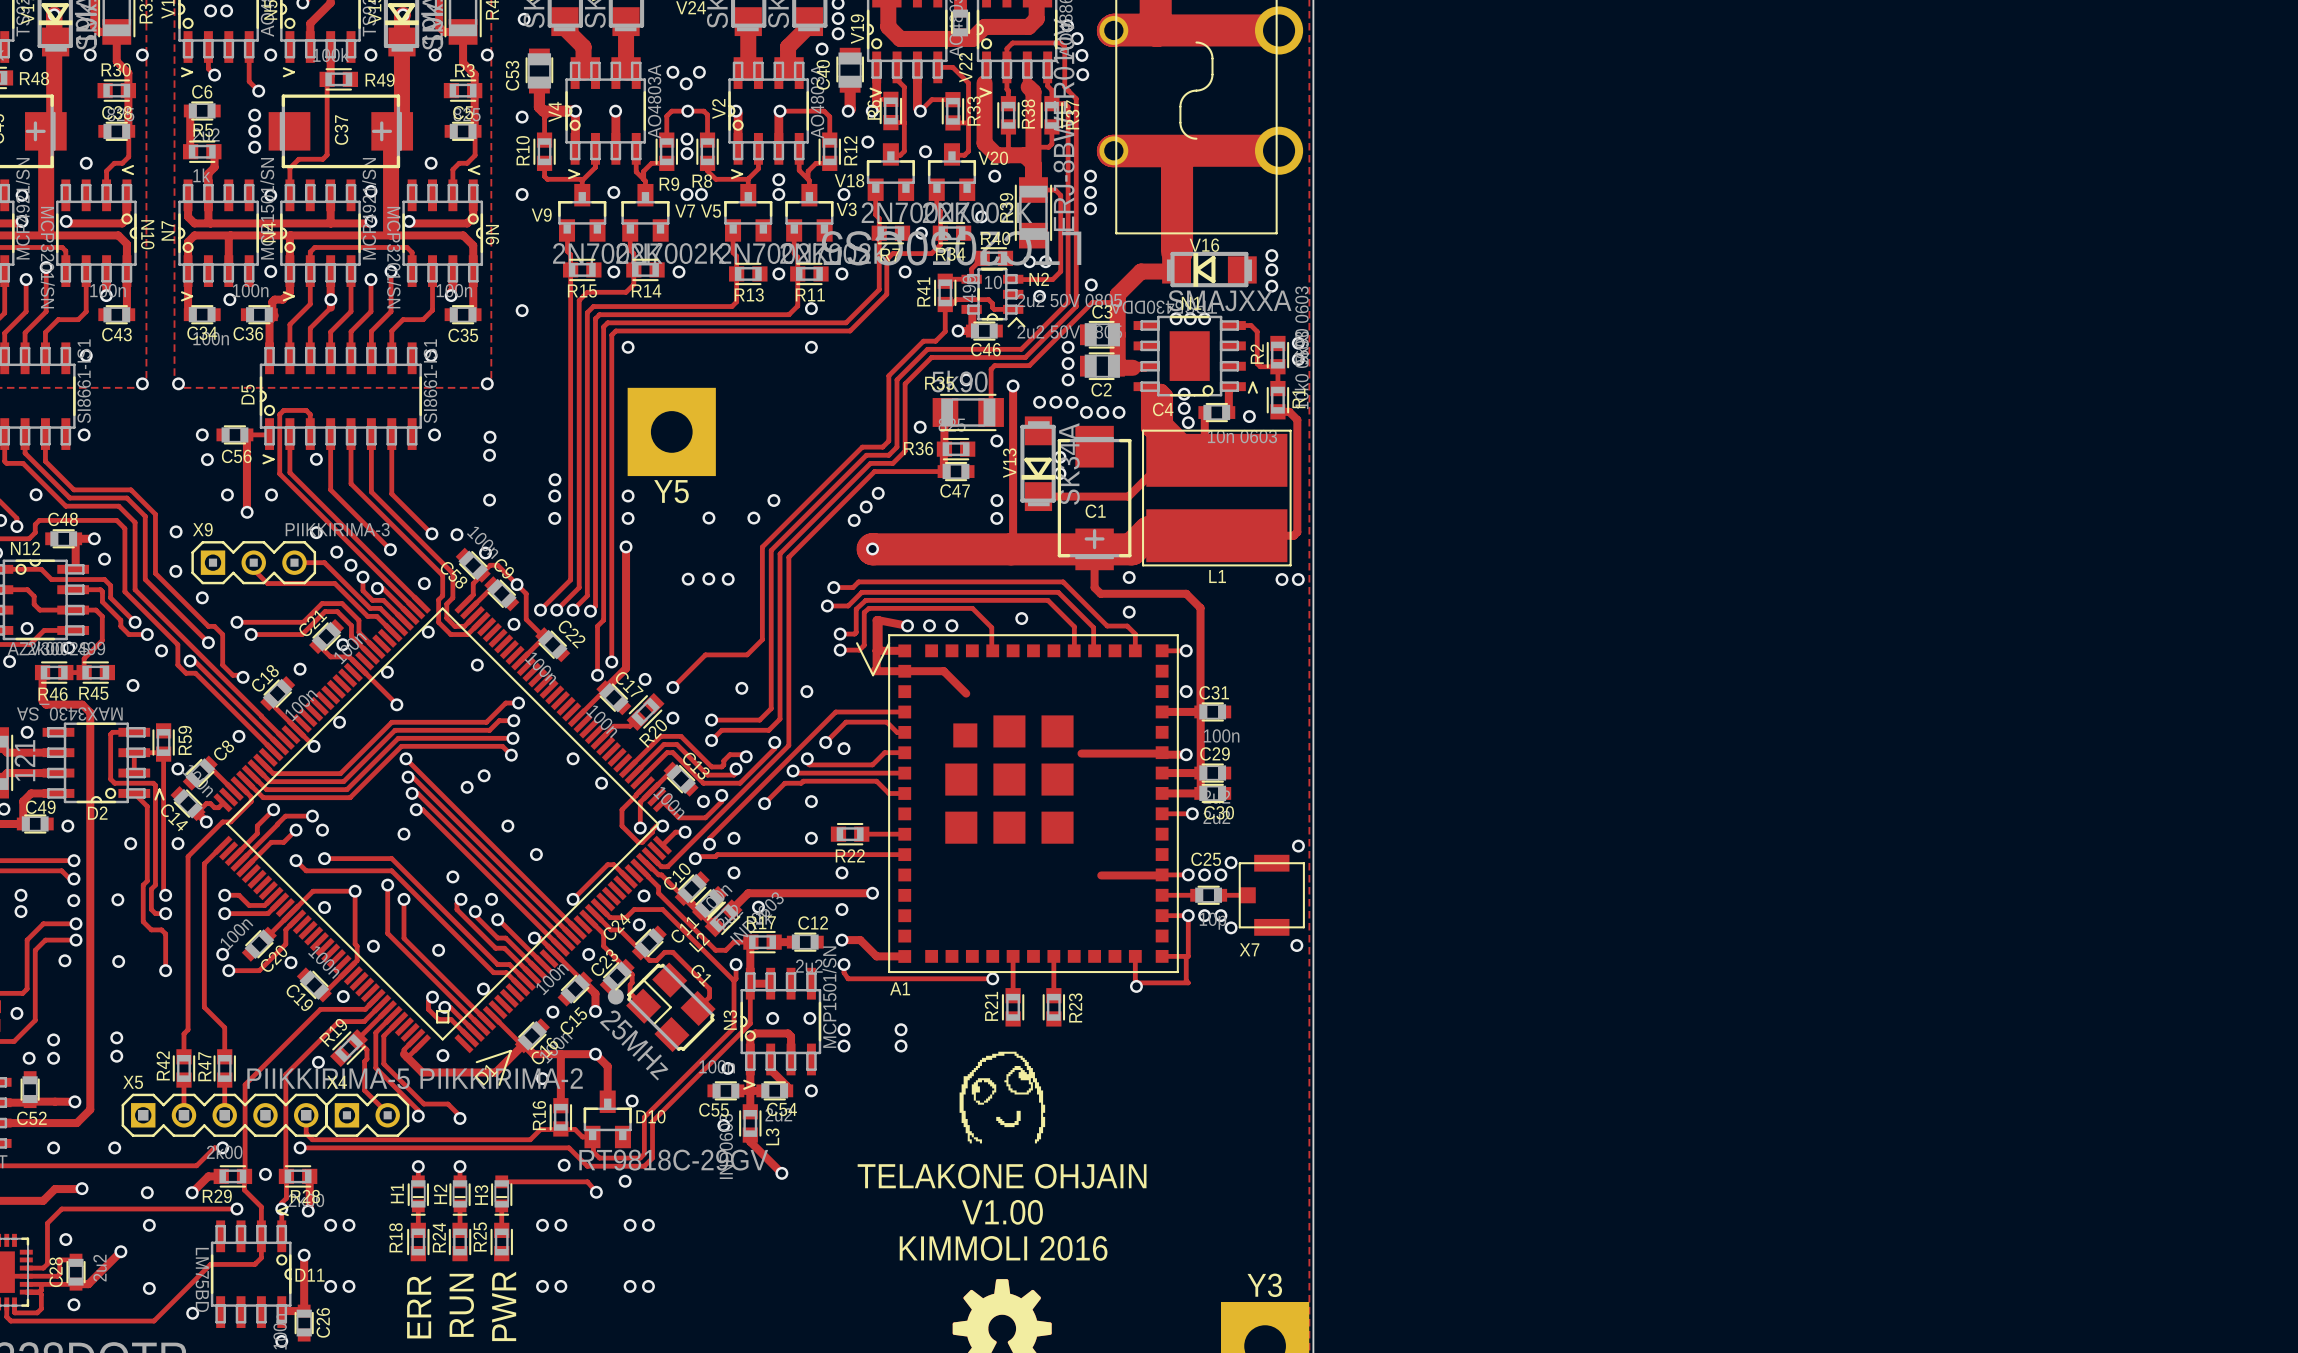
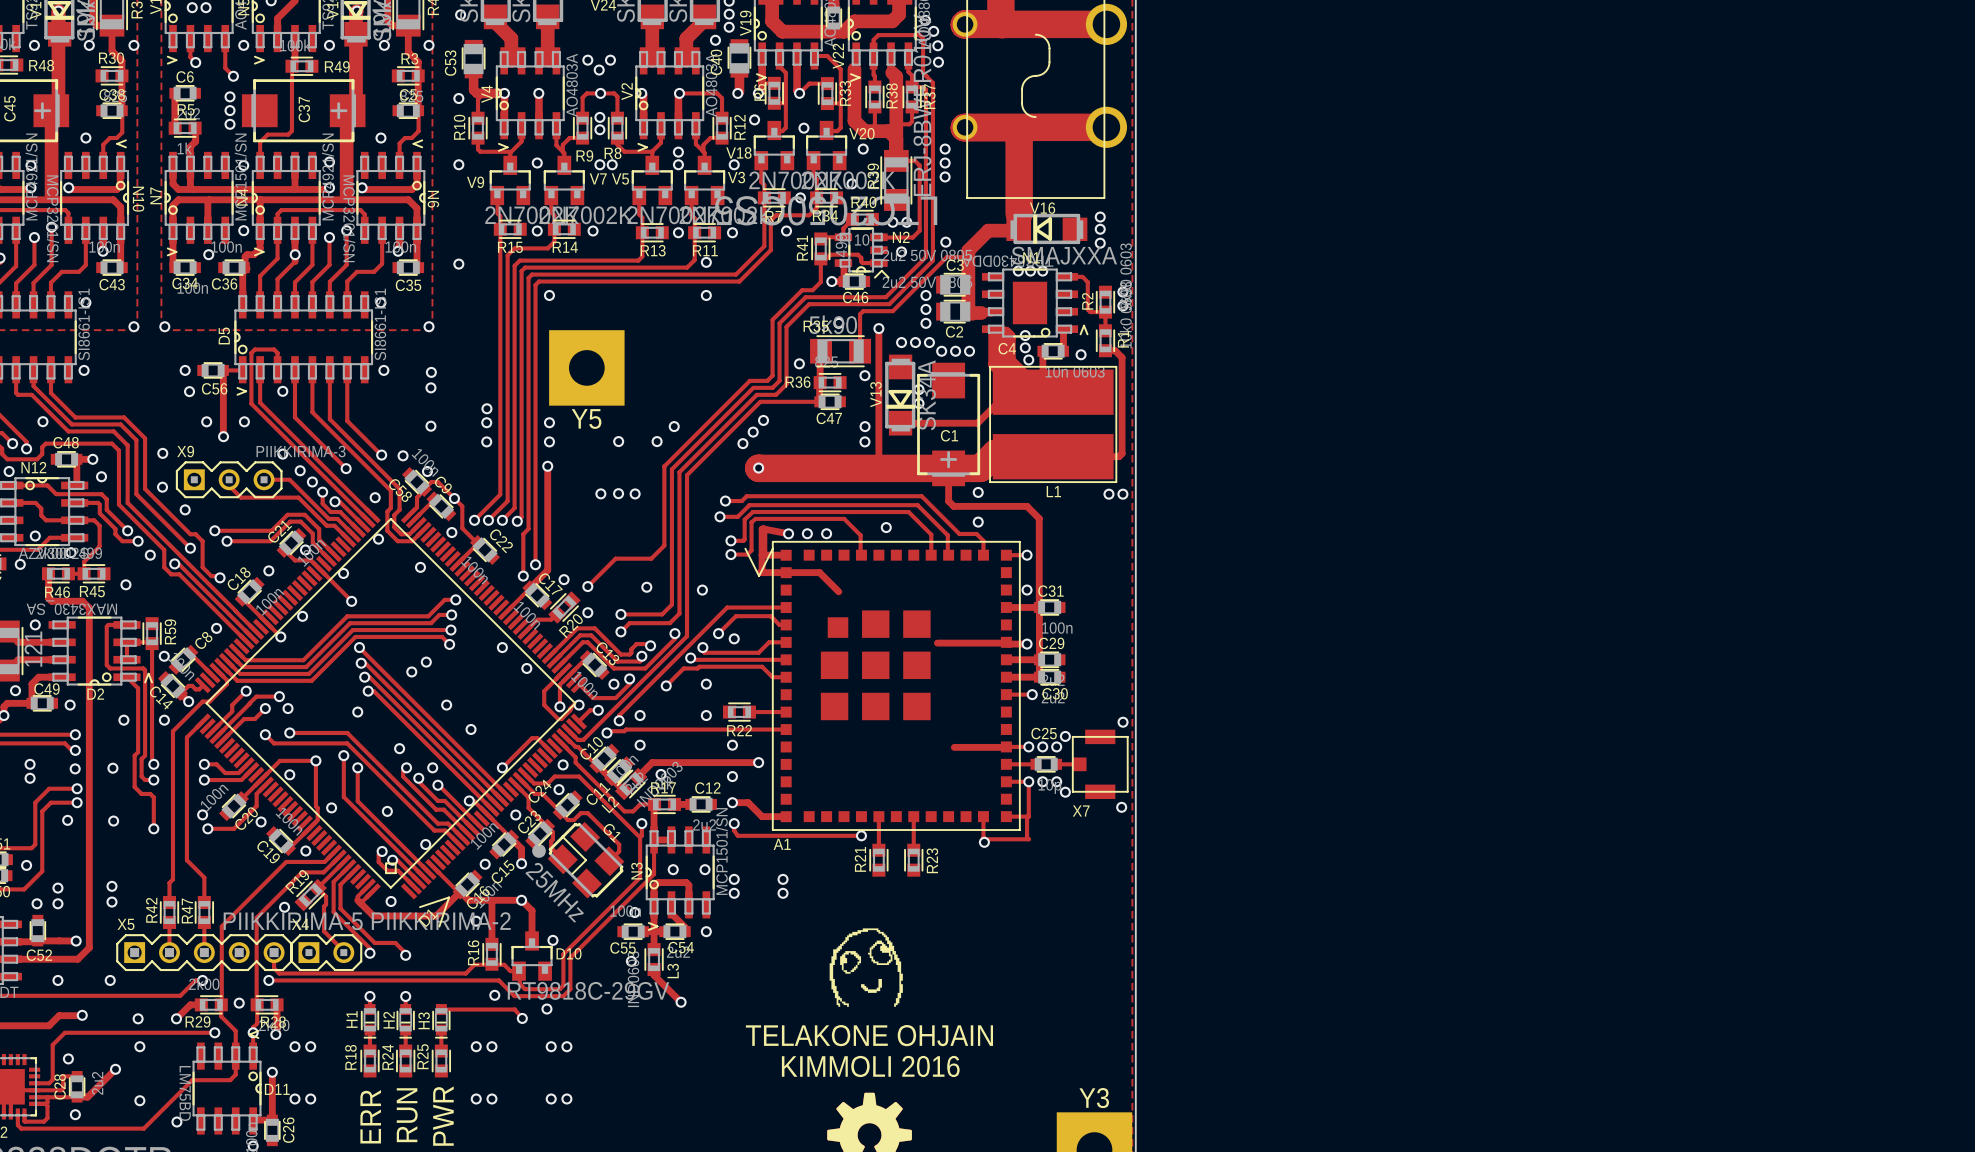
drawing position: (1002, 1097) -> (866, 967)
text: TELAKONE OHJAIN (1002, 1176) -> none
text: V1.00 (1002, 1212) -> TELAKONE OHJAIN (869, 1035)

